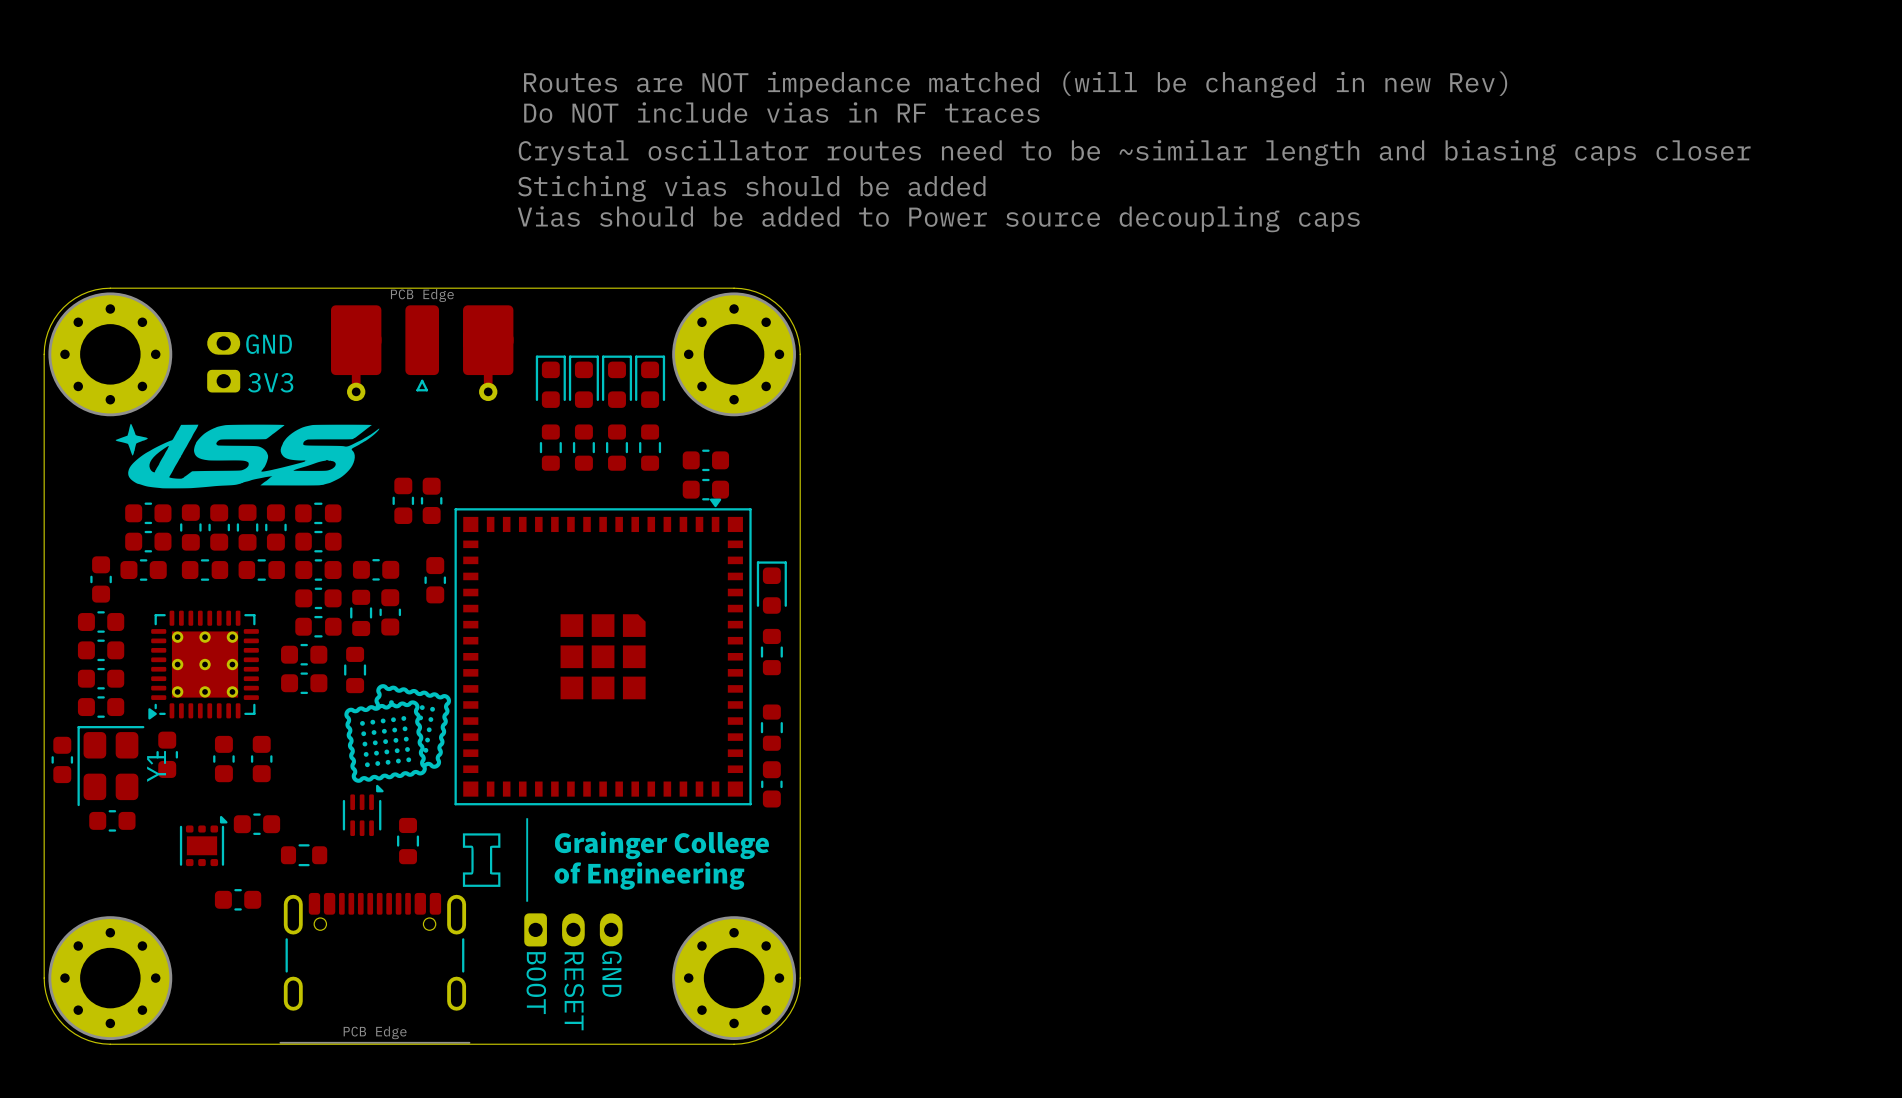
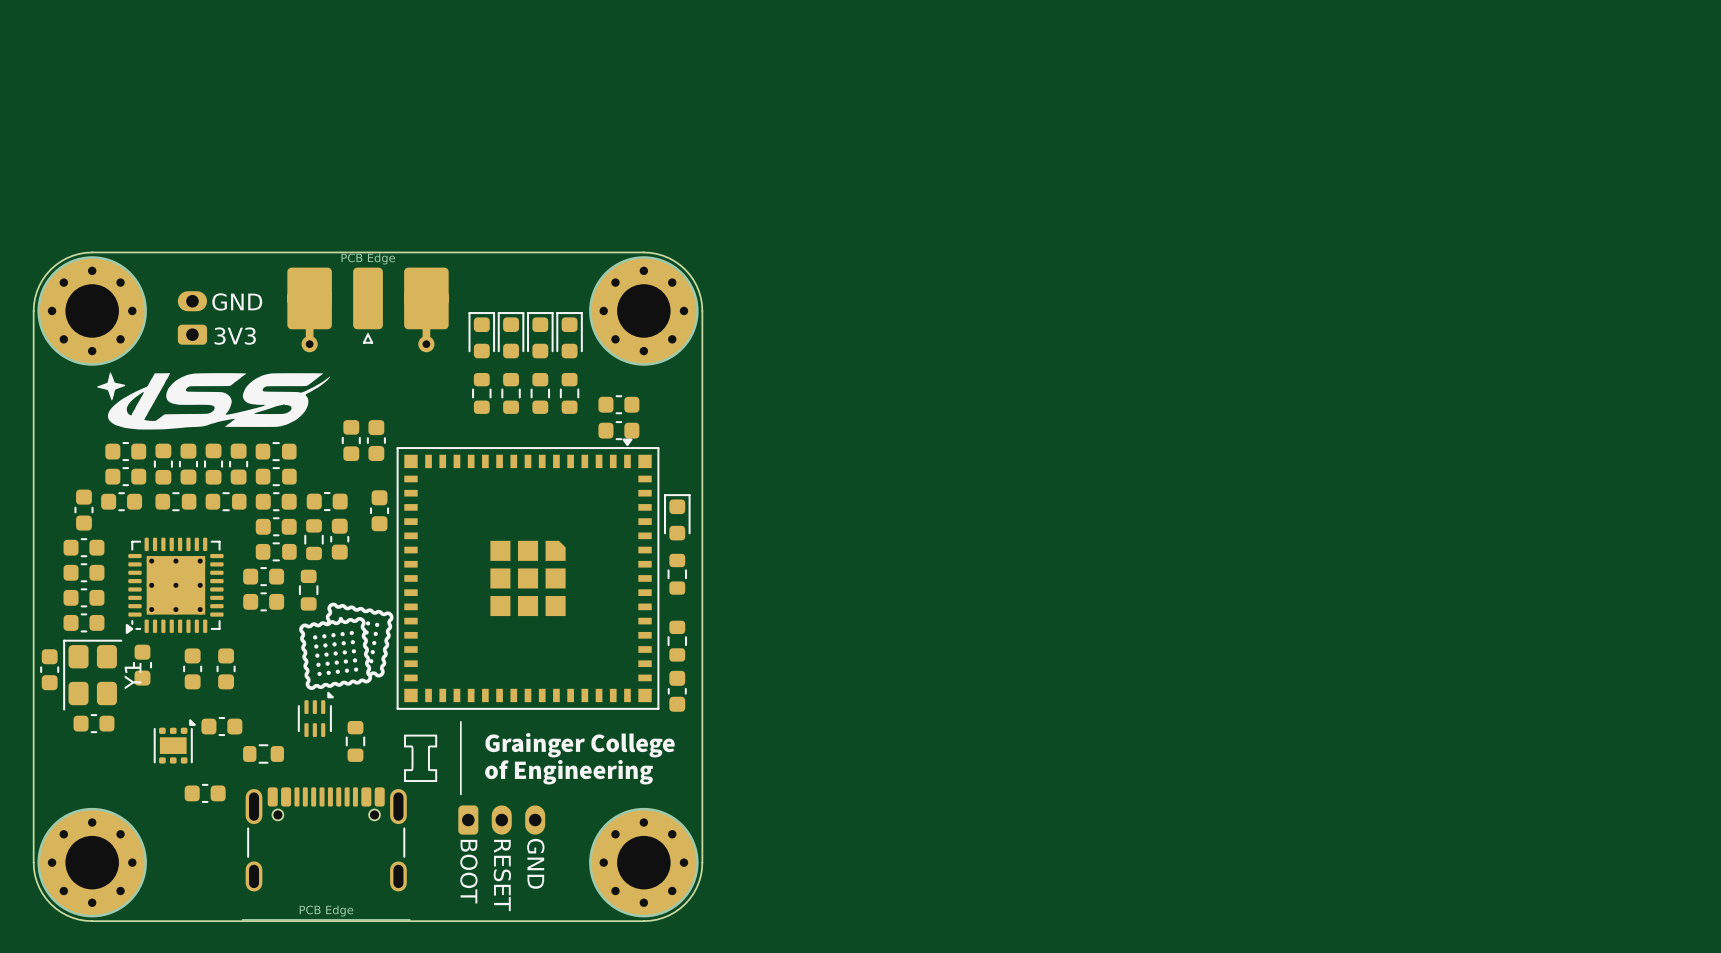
text: Routes are NOT impedance matched (will be changed in new Rev) (1015, 84) -> none
text: Do NOT include vias in RF traces (781, 112) -> none
text: Crystal oscillator routes need to be ~similar length and biasing caps closer (1134, 153) -> none
text: Stiching vias should be added (751, 188) -> none
text: Vias should be added to Power source decoupling caps (938, 219) -> none

